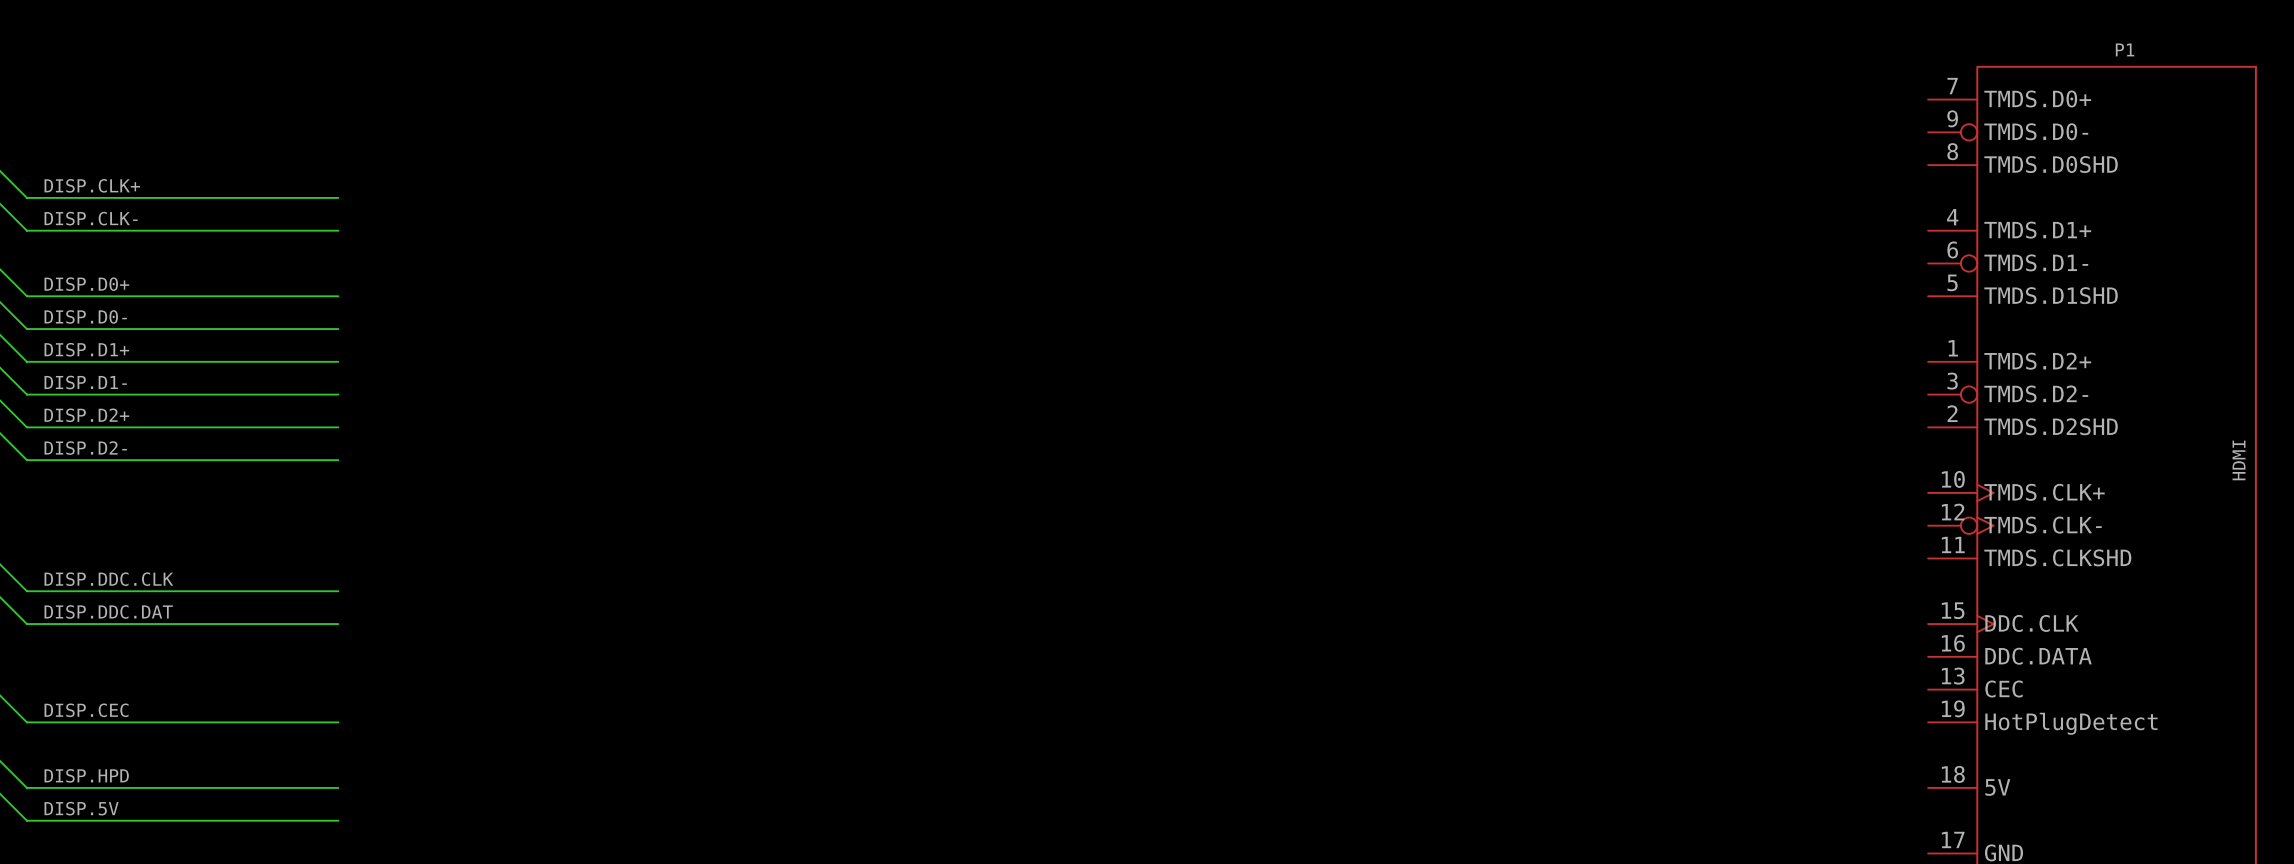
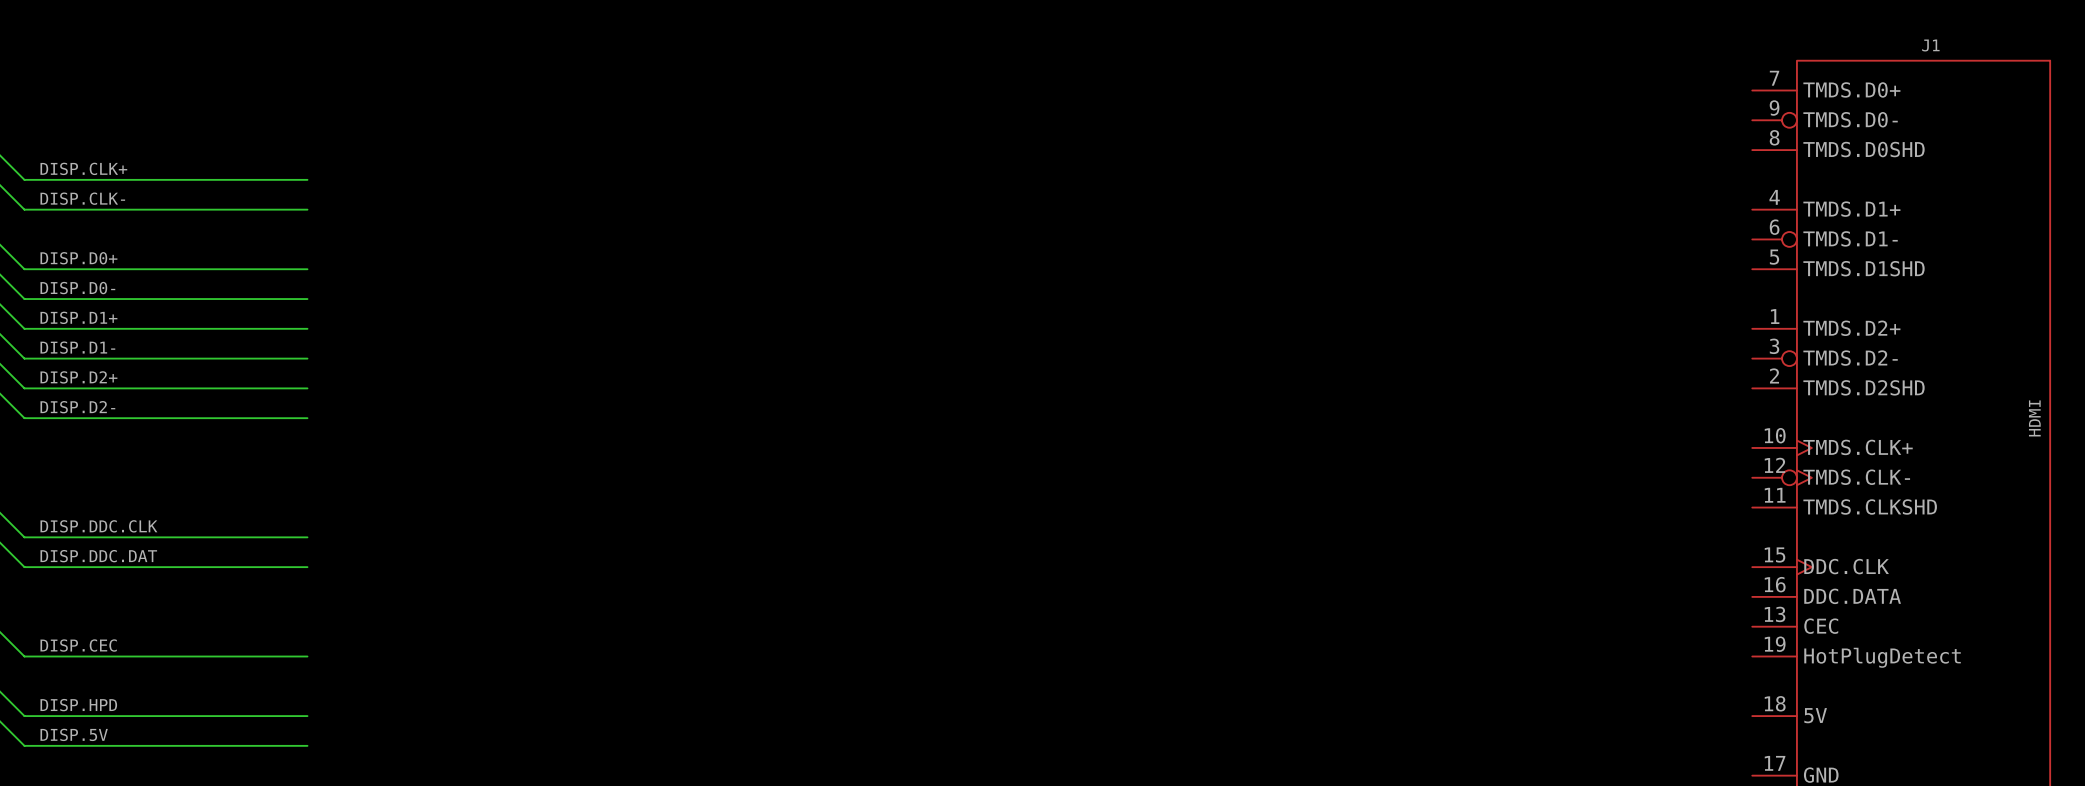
P1 name: P1 (2125, 49) -> J1 (1930, 45)

